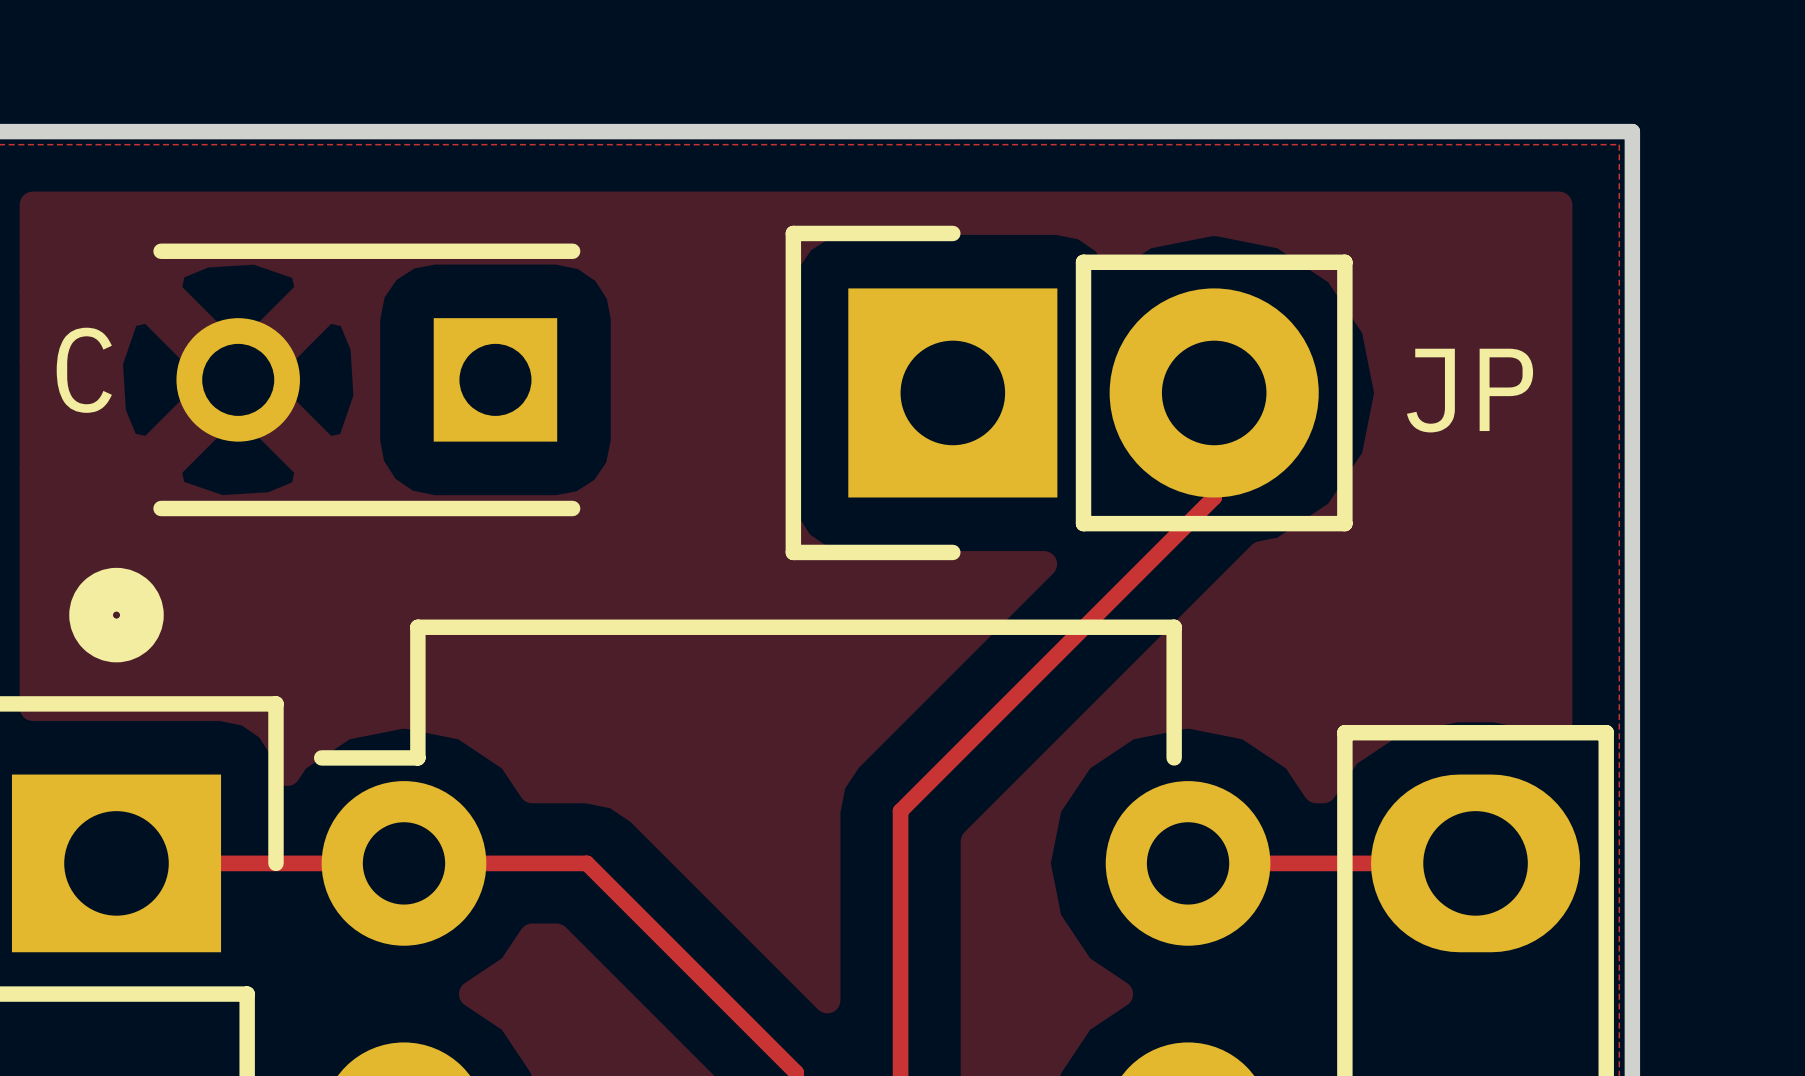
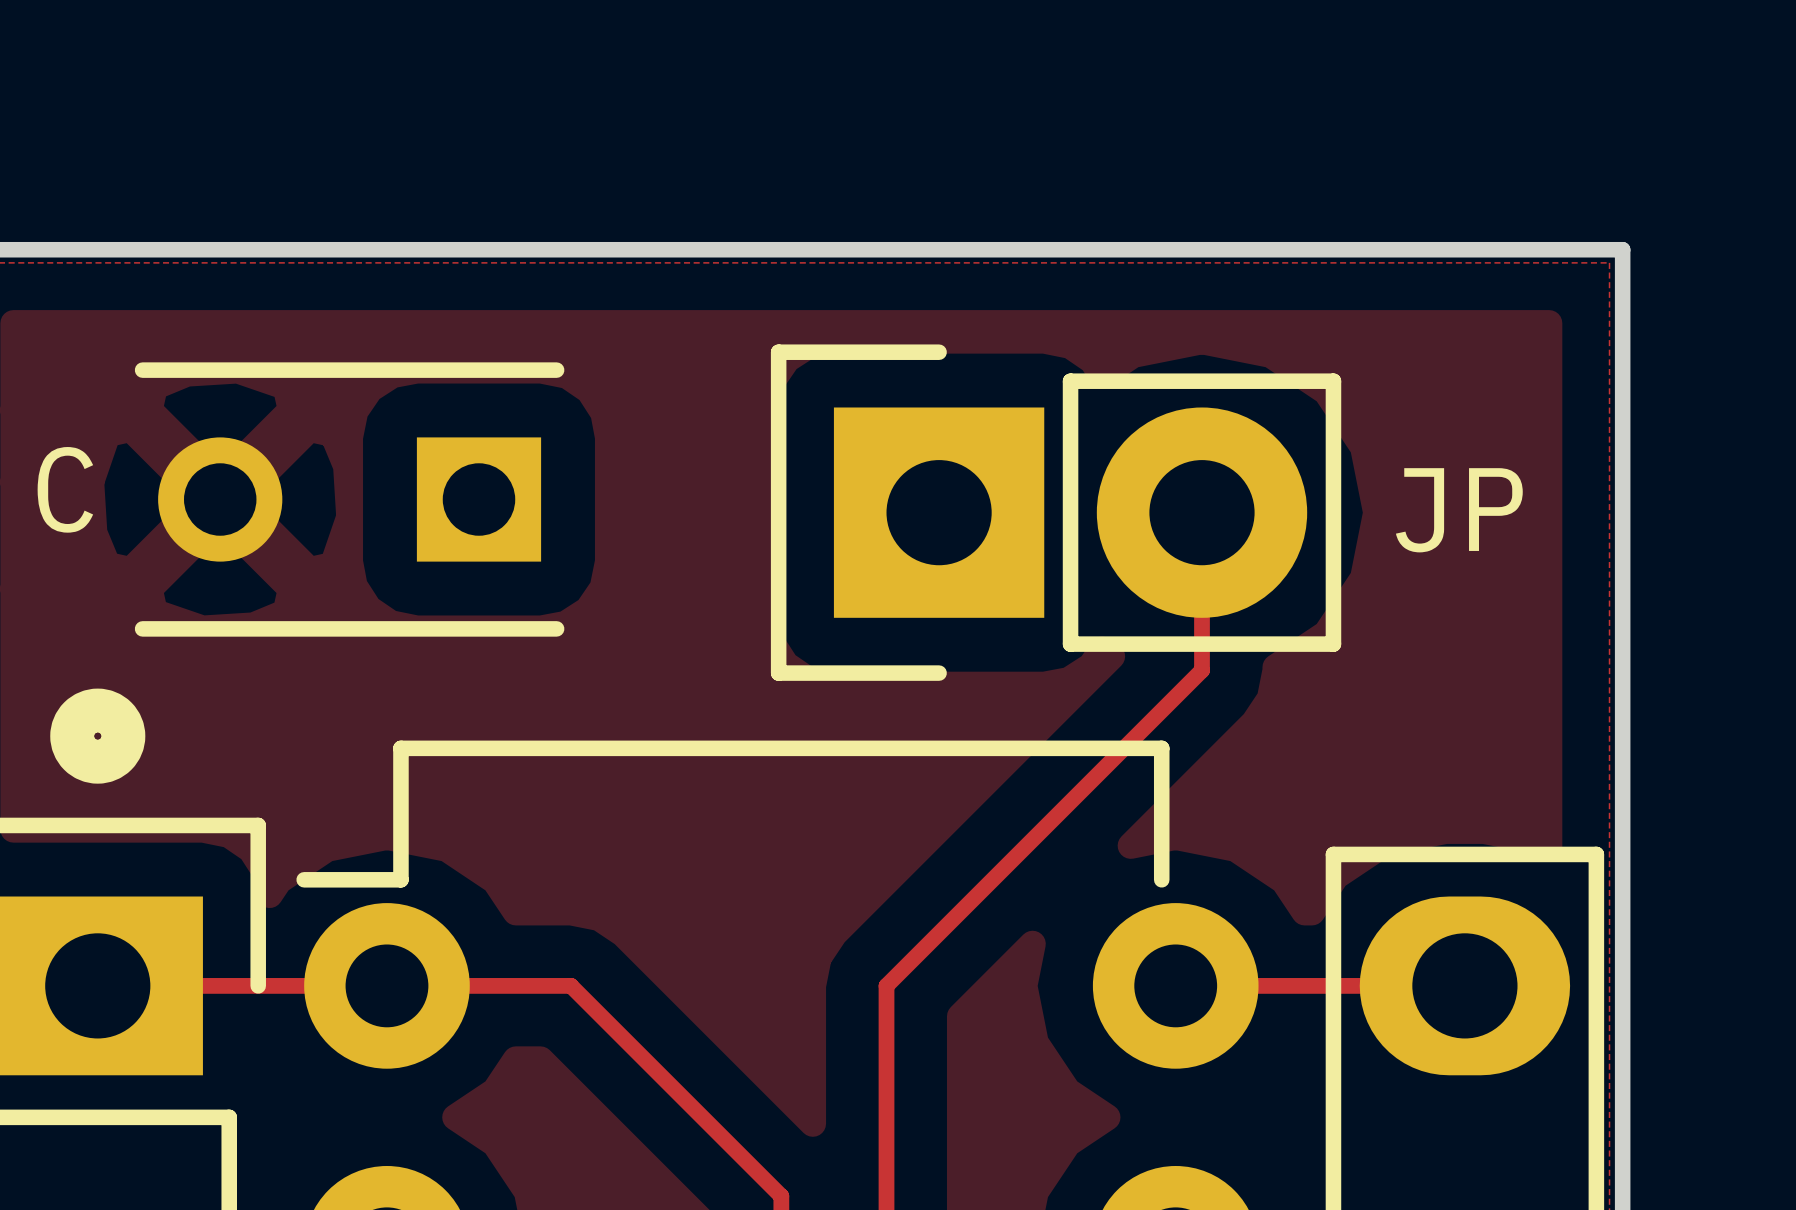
track: (1214, 497) (900, 811) (900, 863) -> (1202, 617) (1202, 670) (886, 985)

